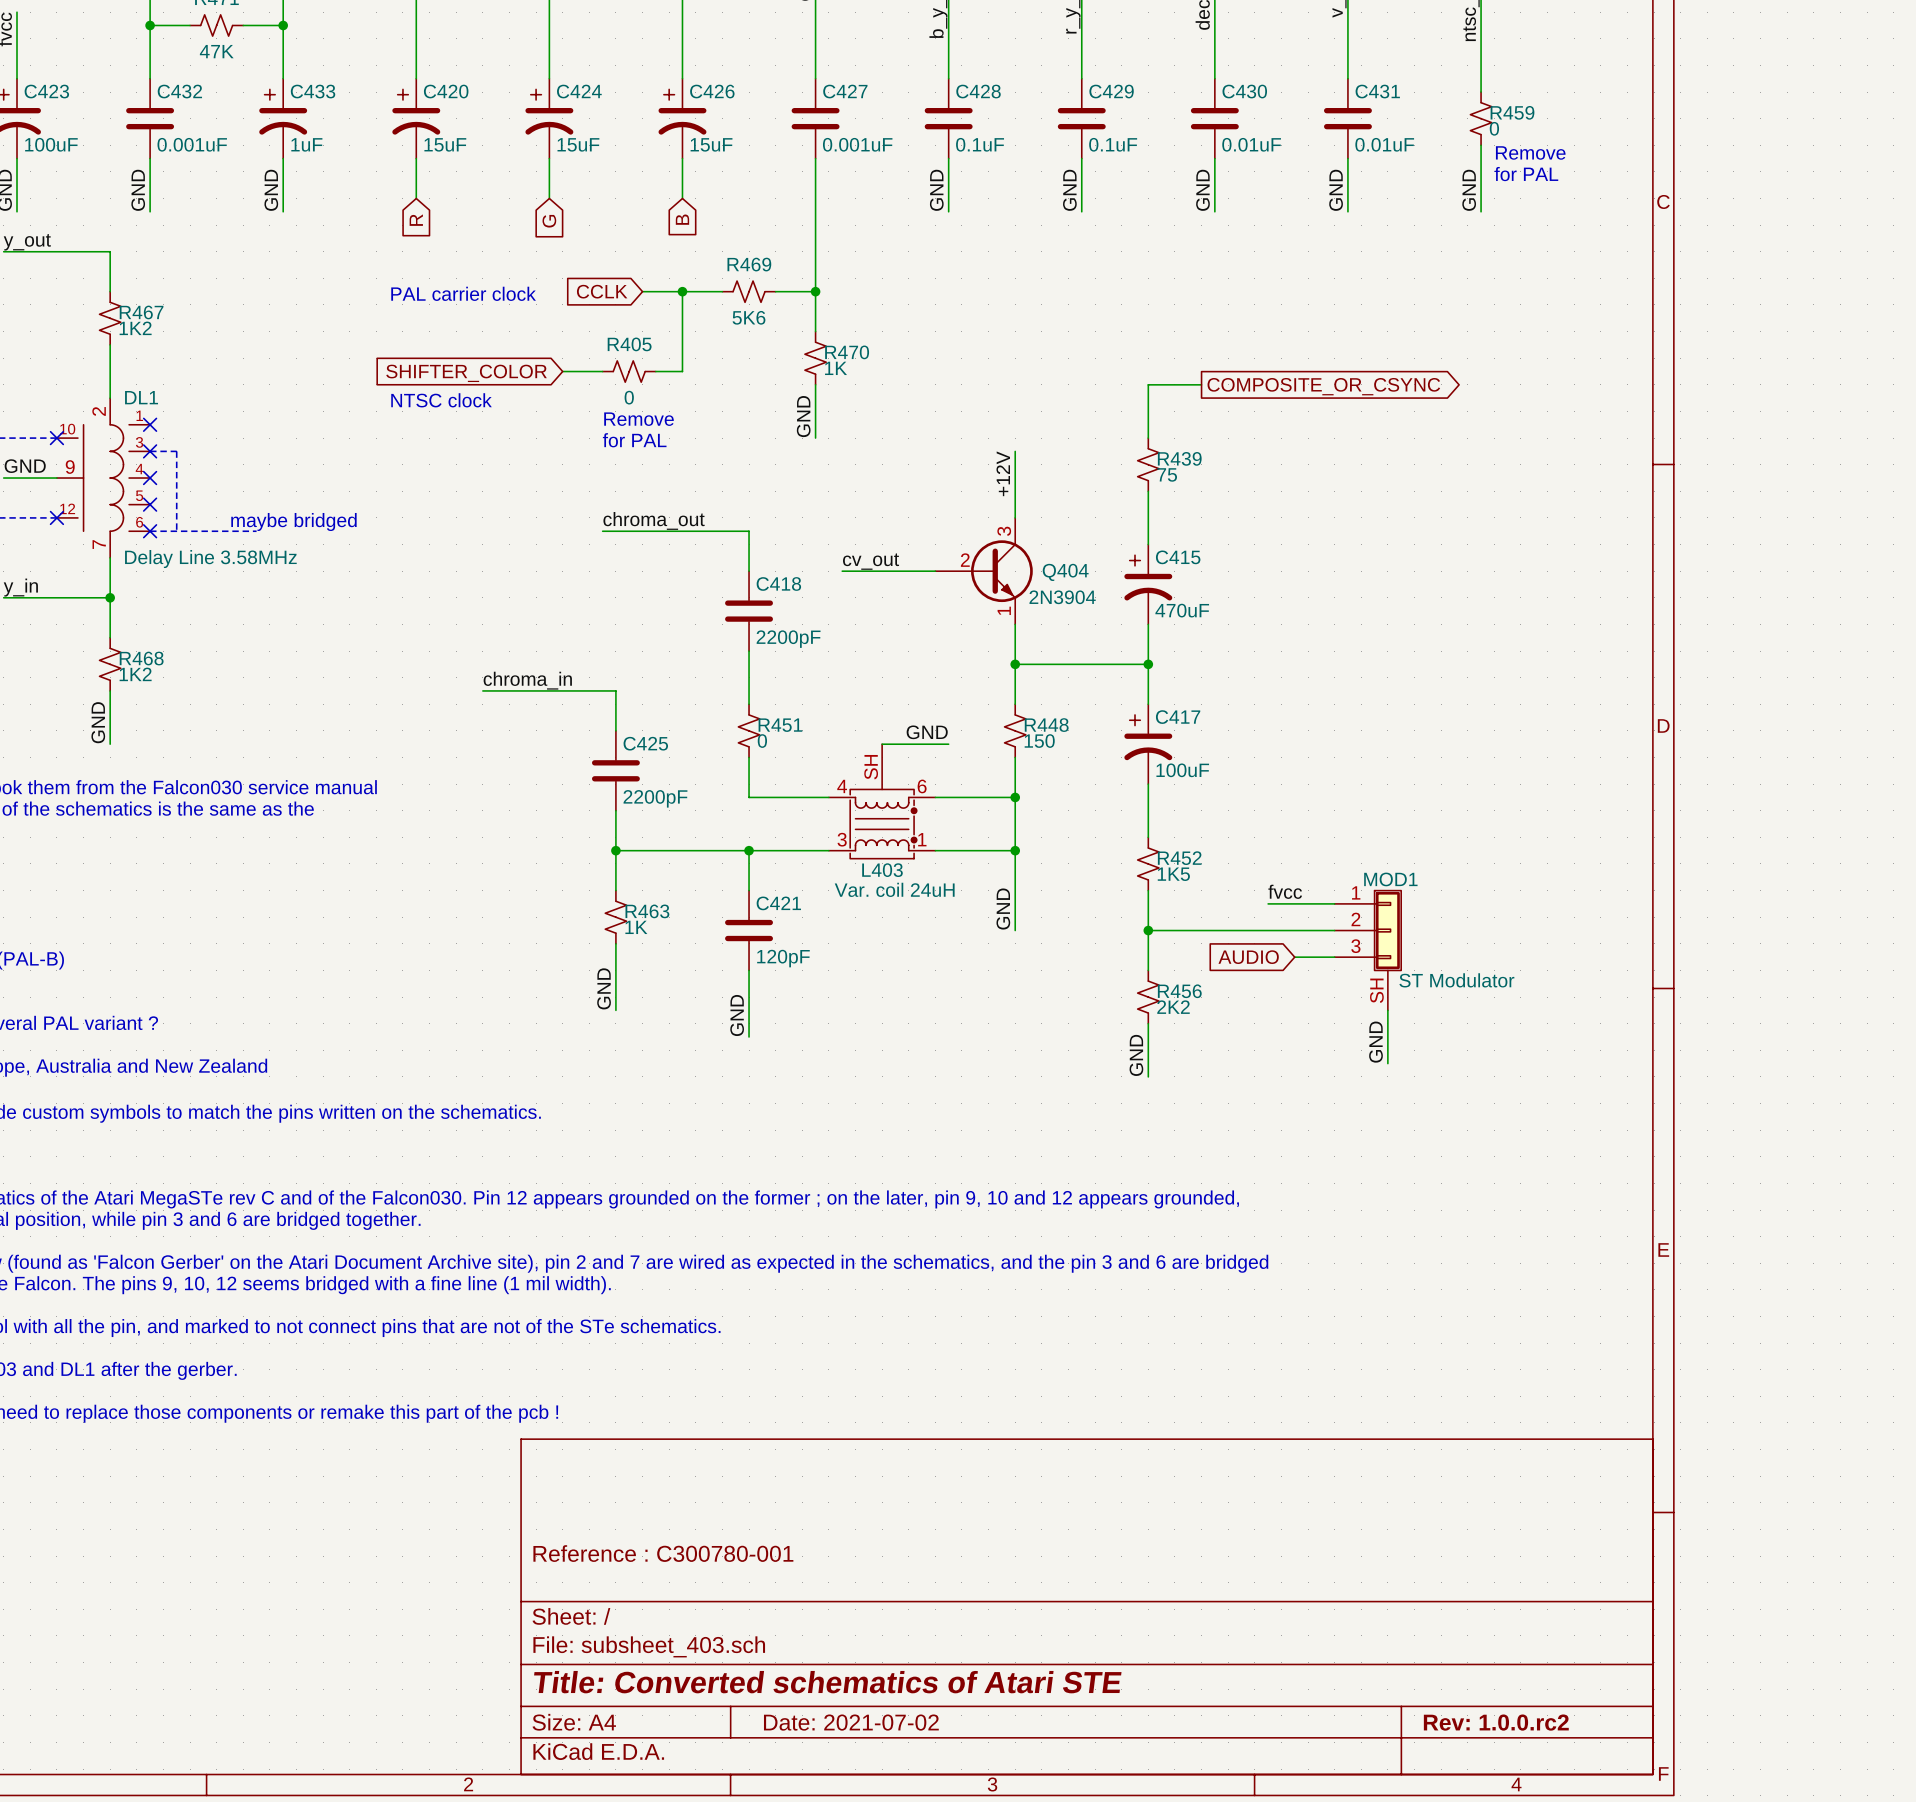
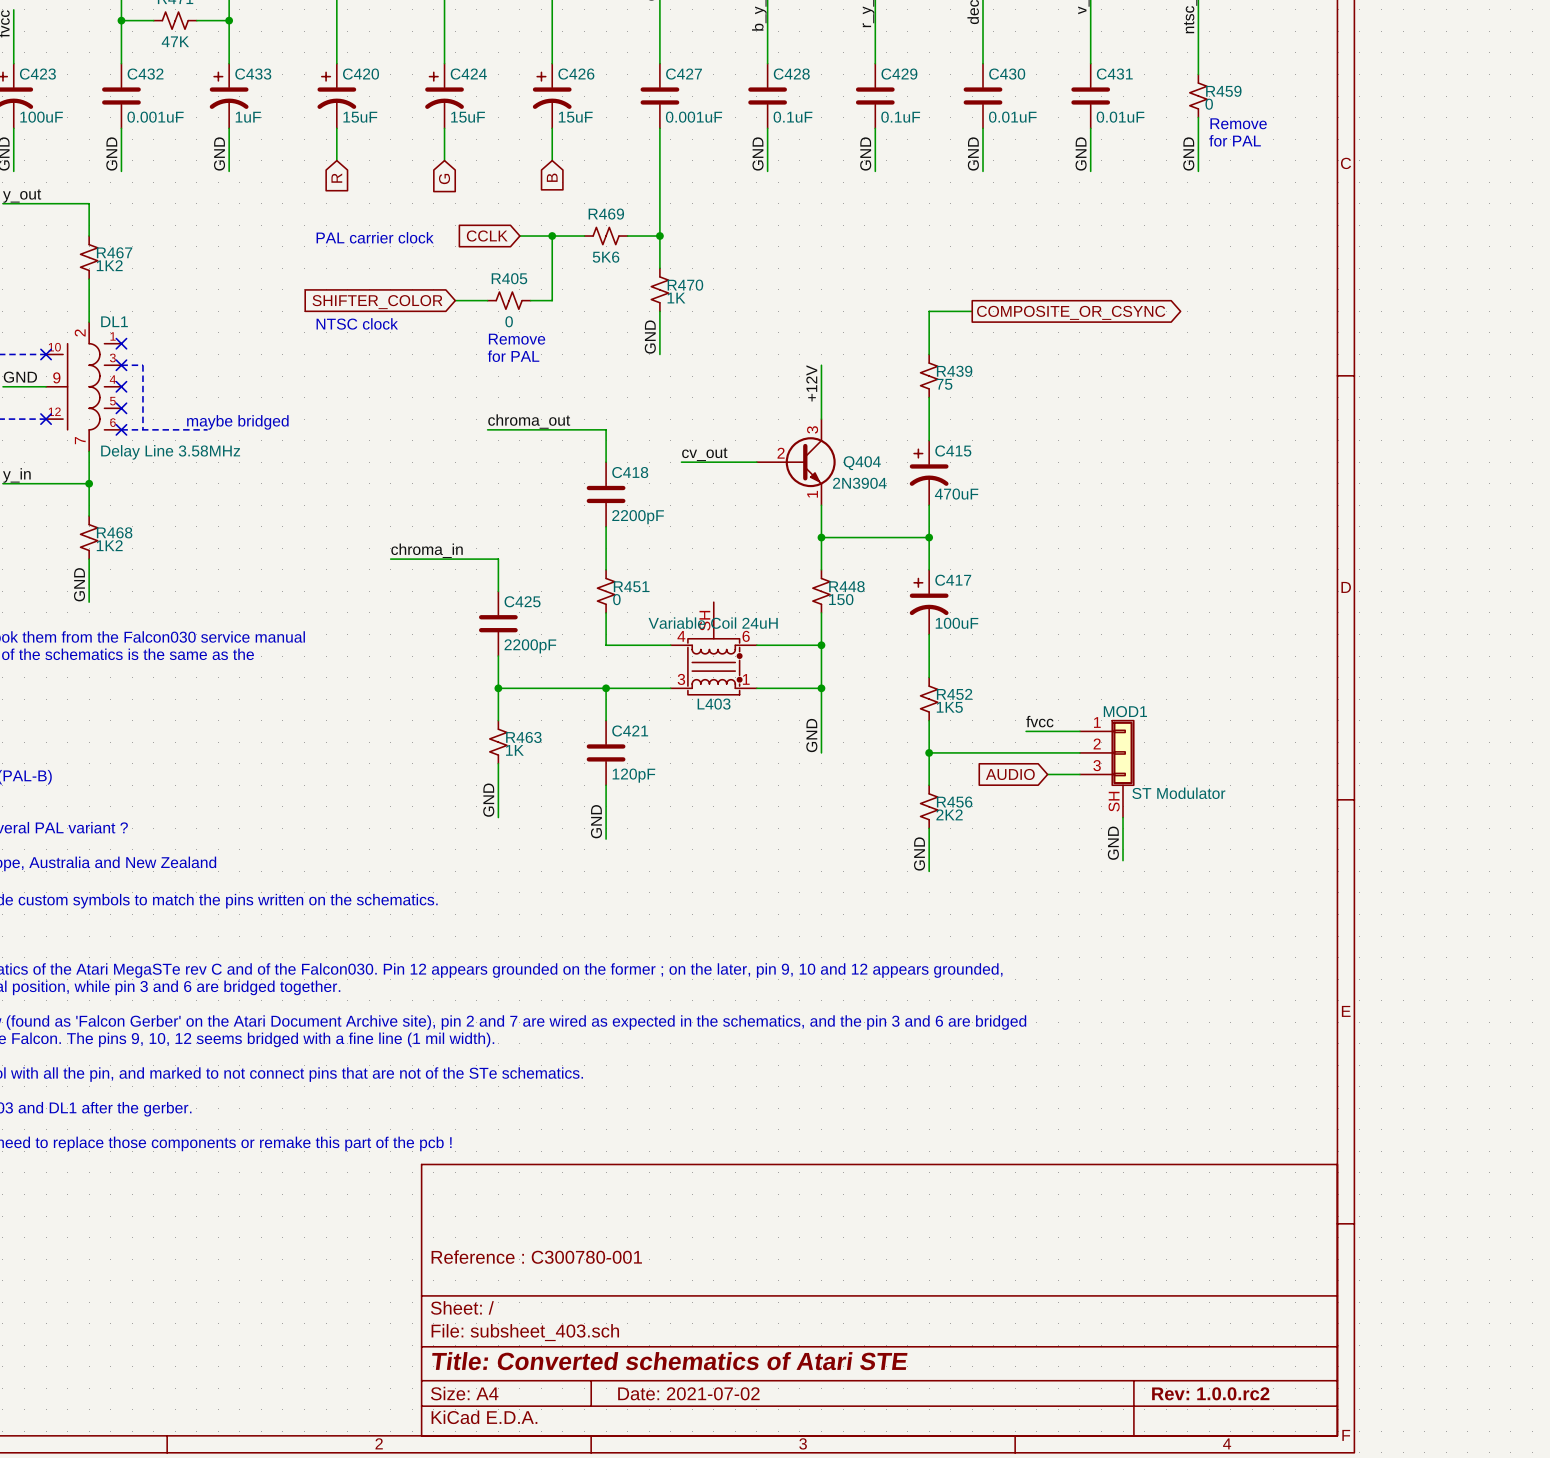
label: GND (927, 732) -> none
wire: (882, 744) (948, 744) -> none
L403 value: Var. coil 24uH (894, 889) -> Variable Coil 24uH (713, 623)

